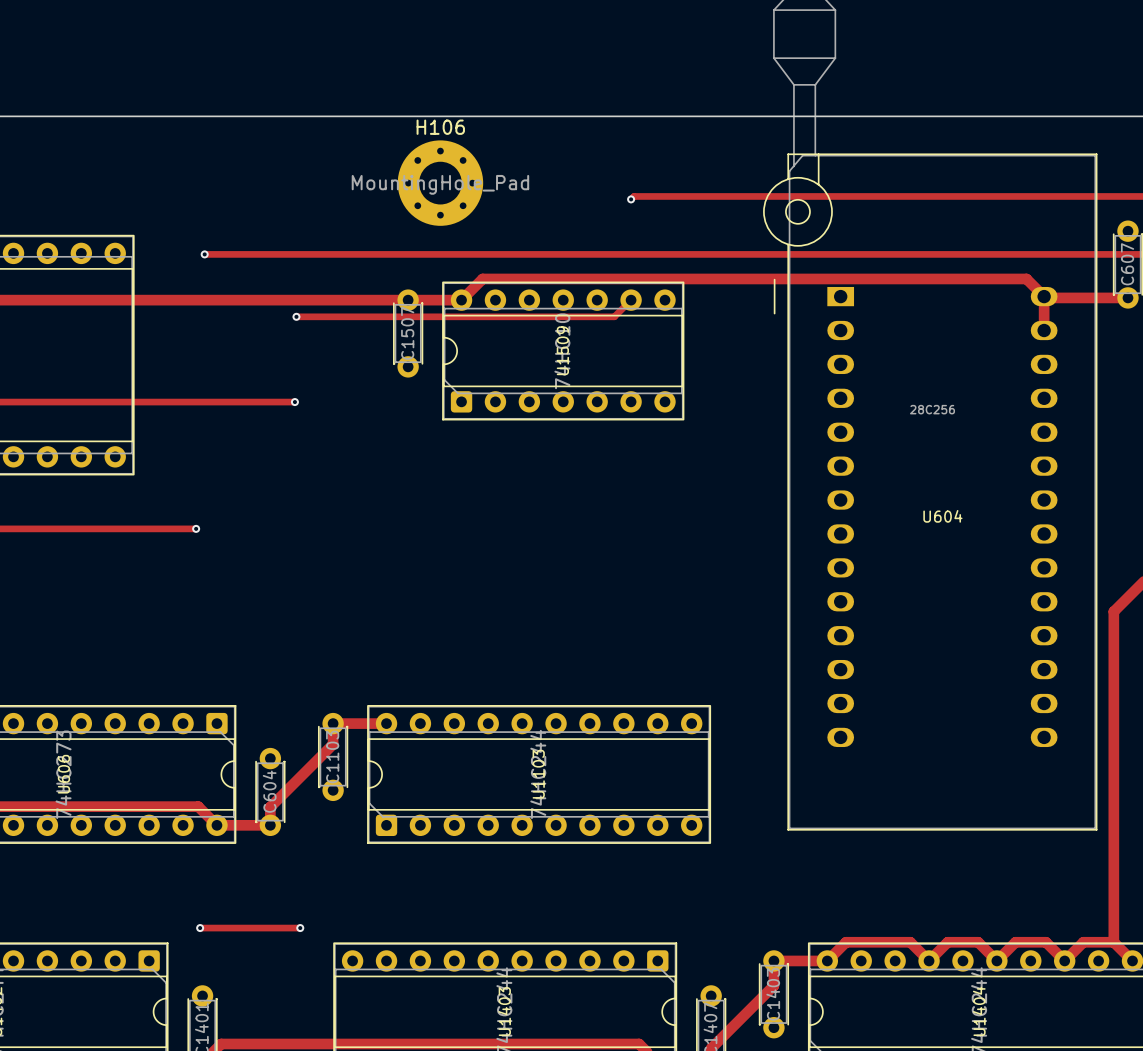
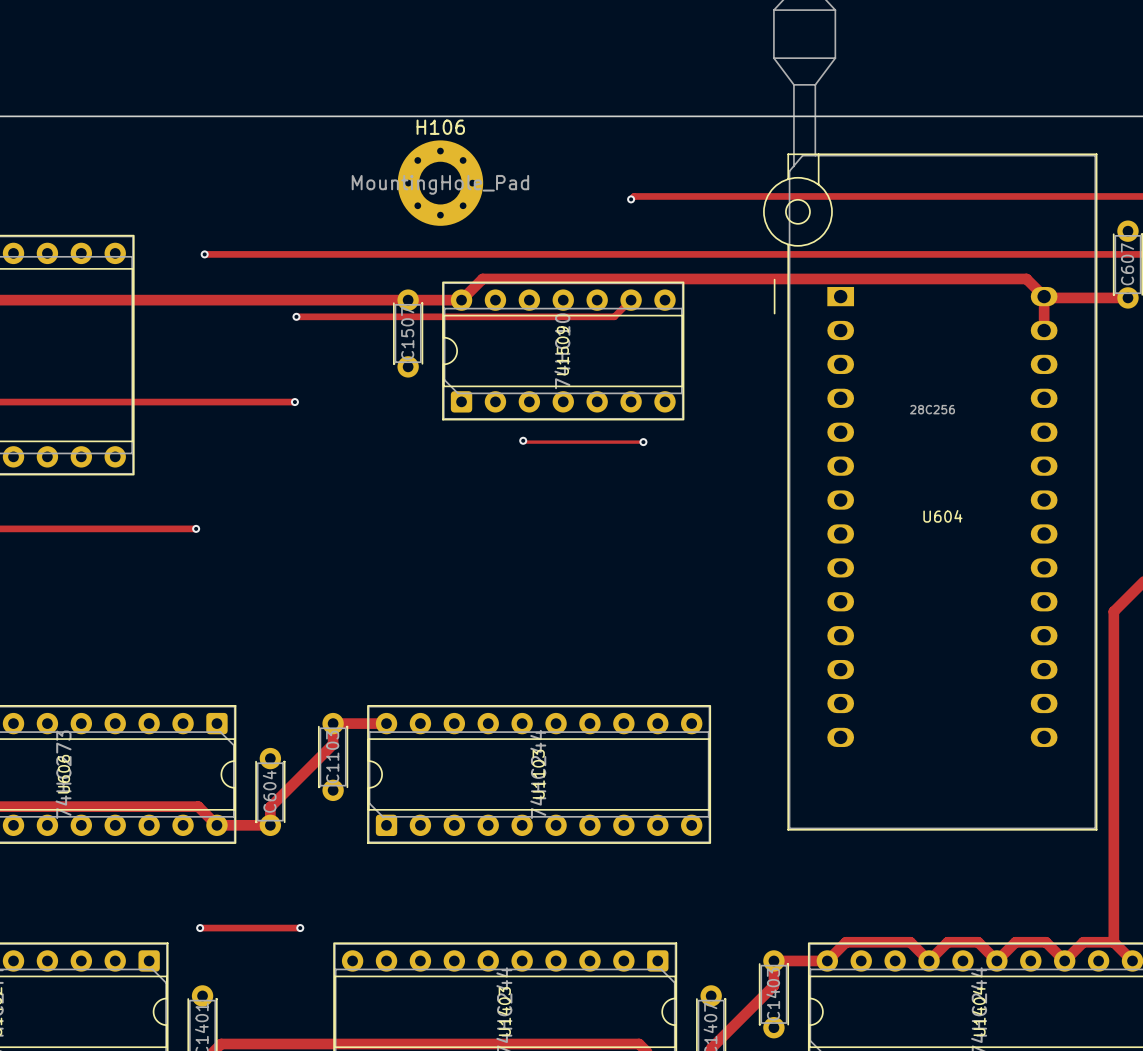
track: none -> (523, 440) (643, 442)
via: none -> (523, 440)
via: none -> (643, 442)

